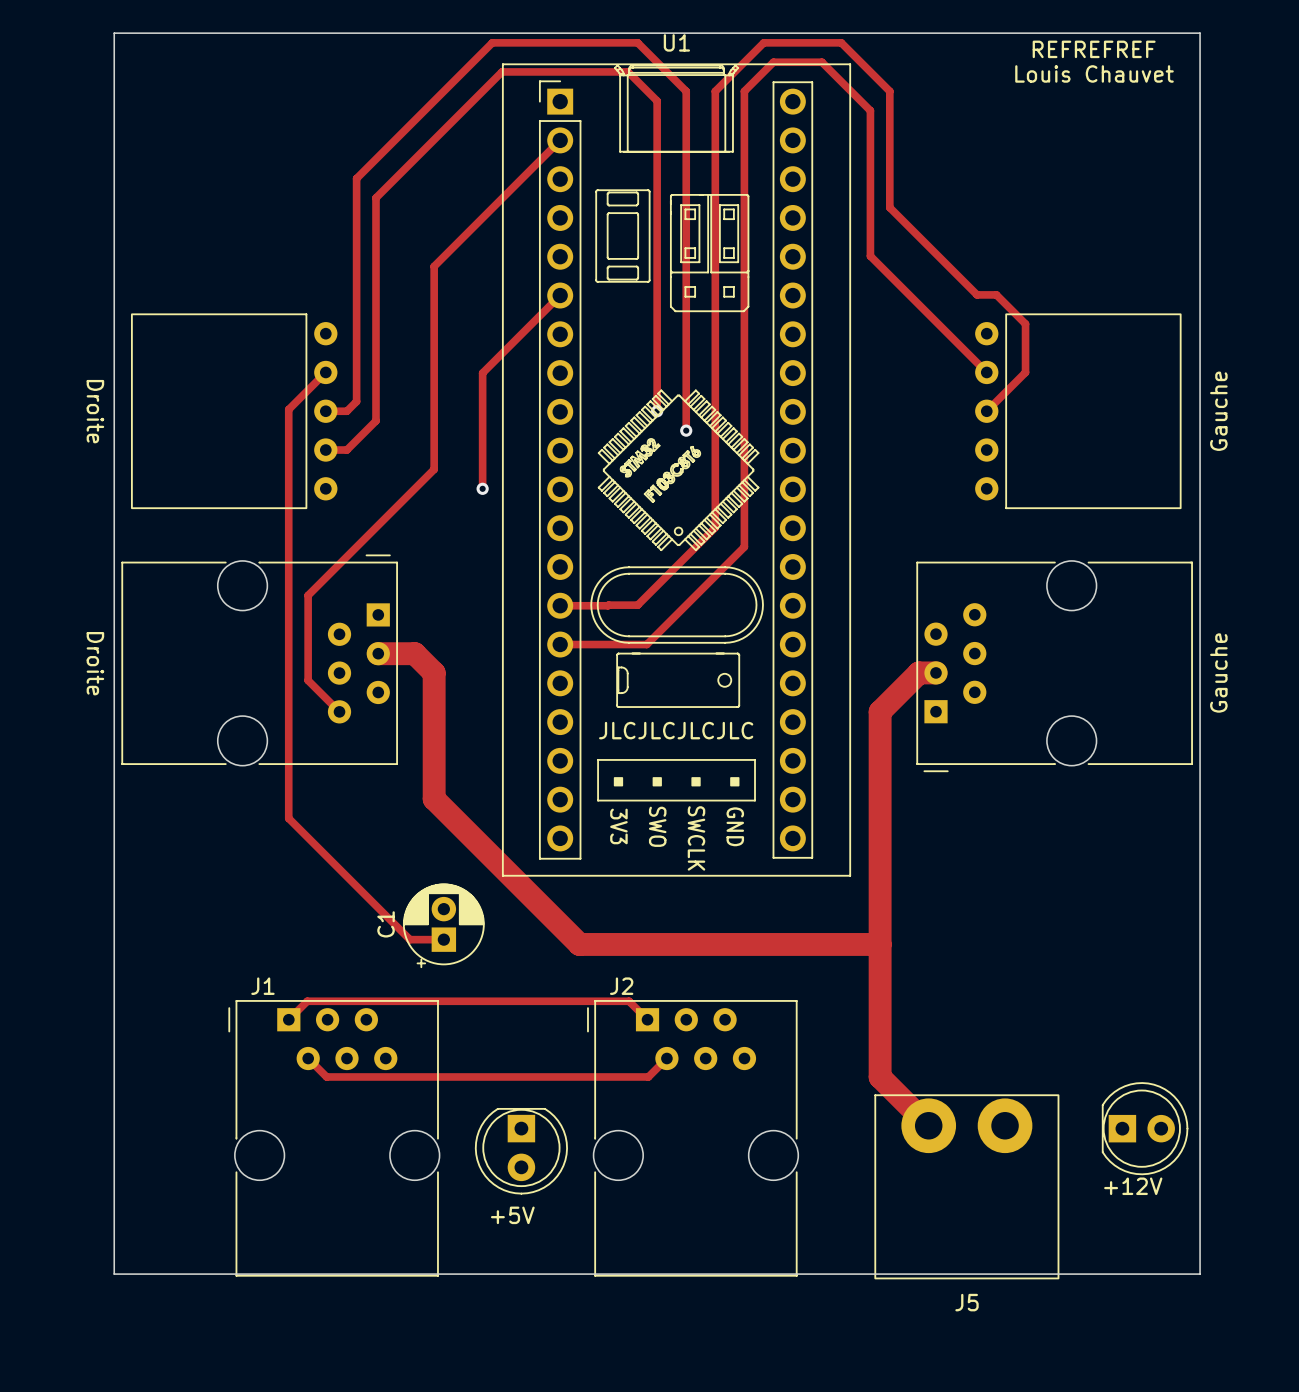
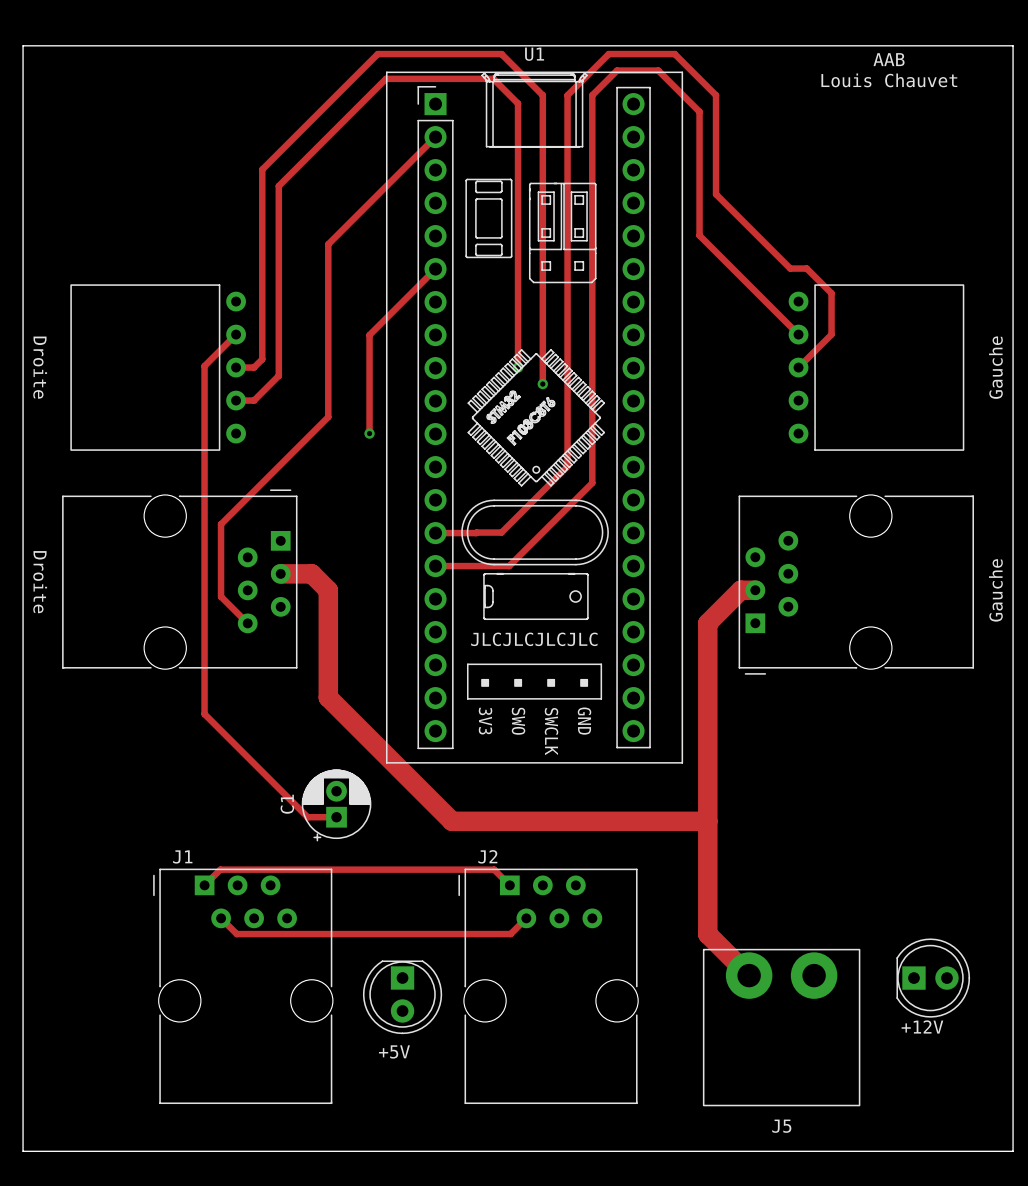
board edge: (114, 33) (114, 1274) (1200, 1274) (1200, 33) -> (56, 45) (23, 45) (23, 1151) (1013, 1151) (1013, 45) (980, 45)
text: REFREFREF (1094, 49) -> AAB (889, 59)

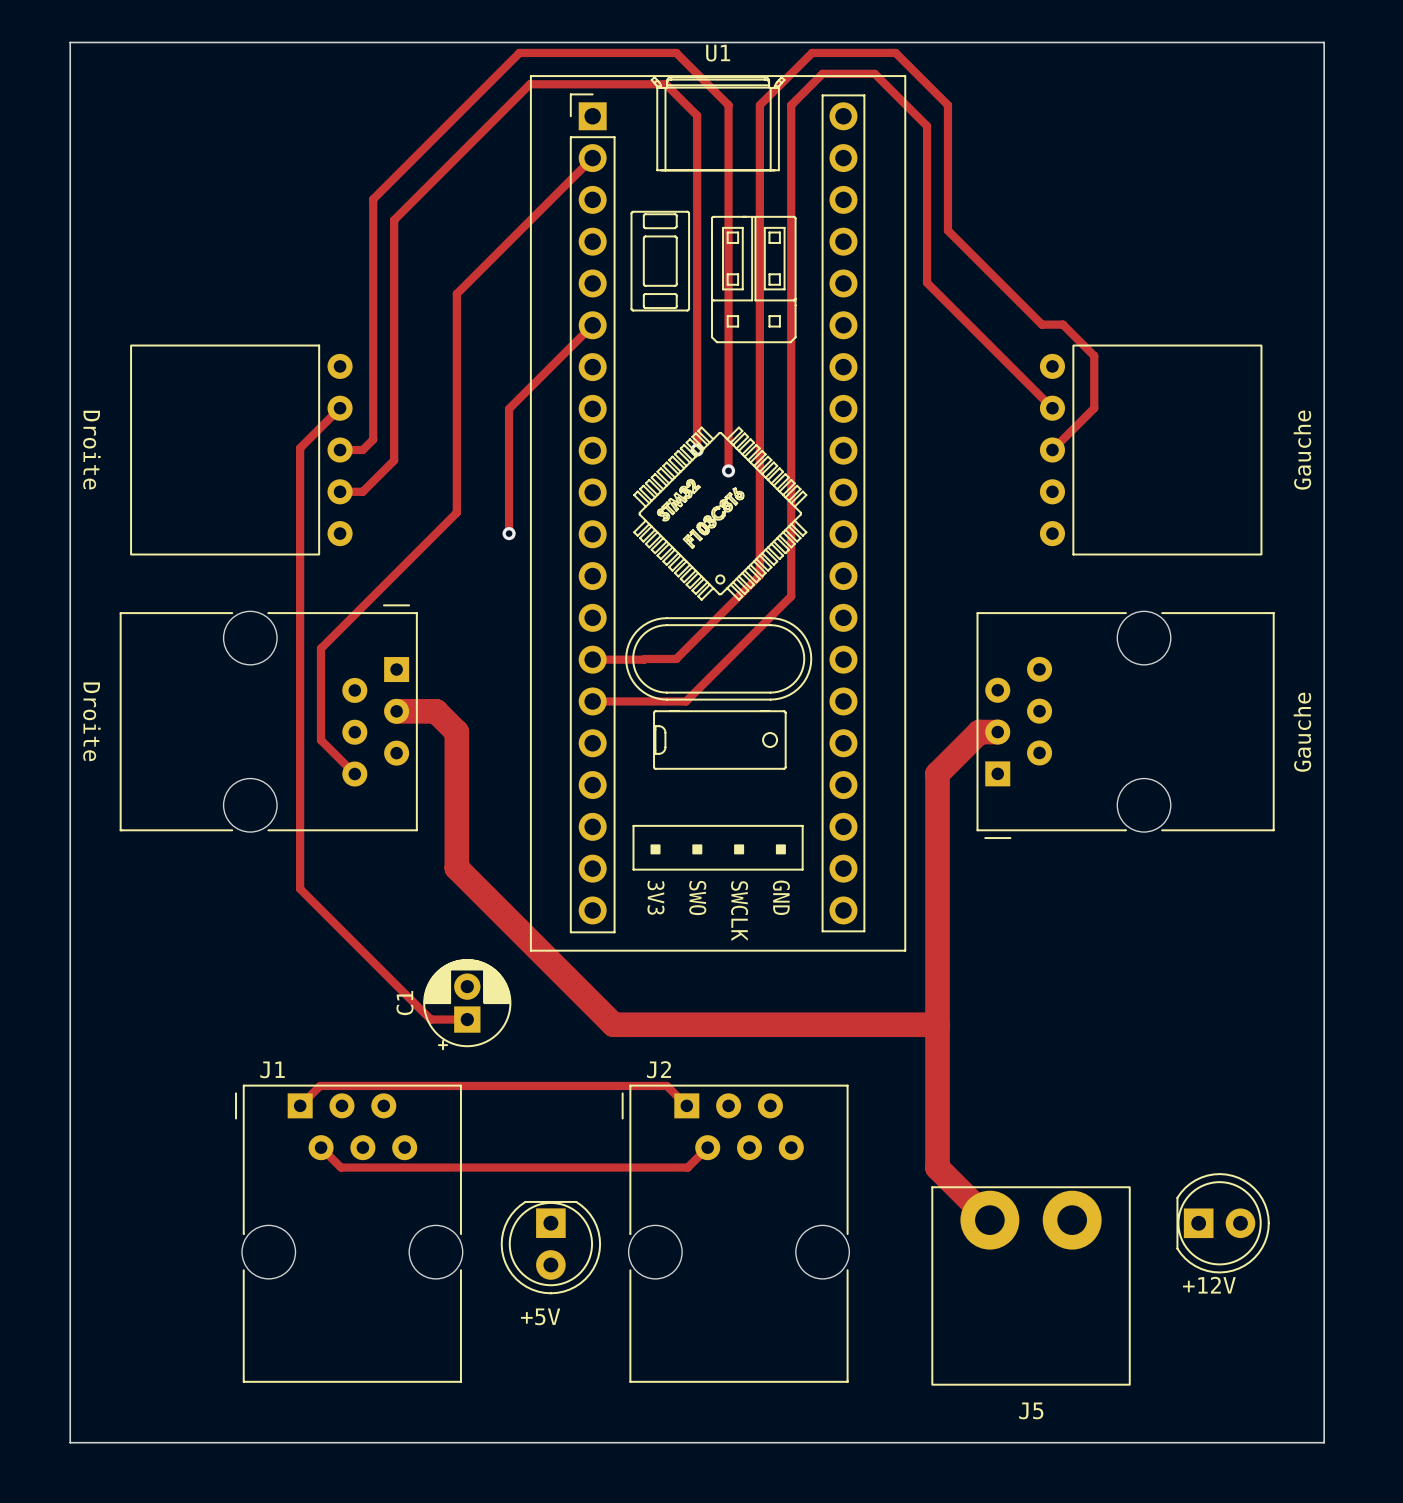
text: AAB (889, 59) -> none
text: Louis Chauvet (889, 80) -> none
text: JLCJLCJLCJLC (534, 639) -> none

